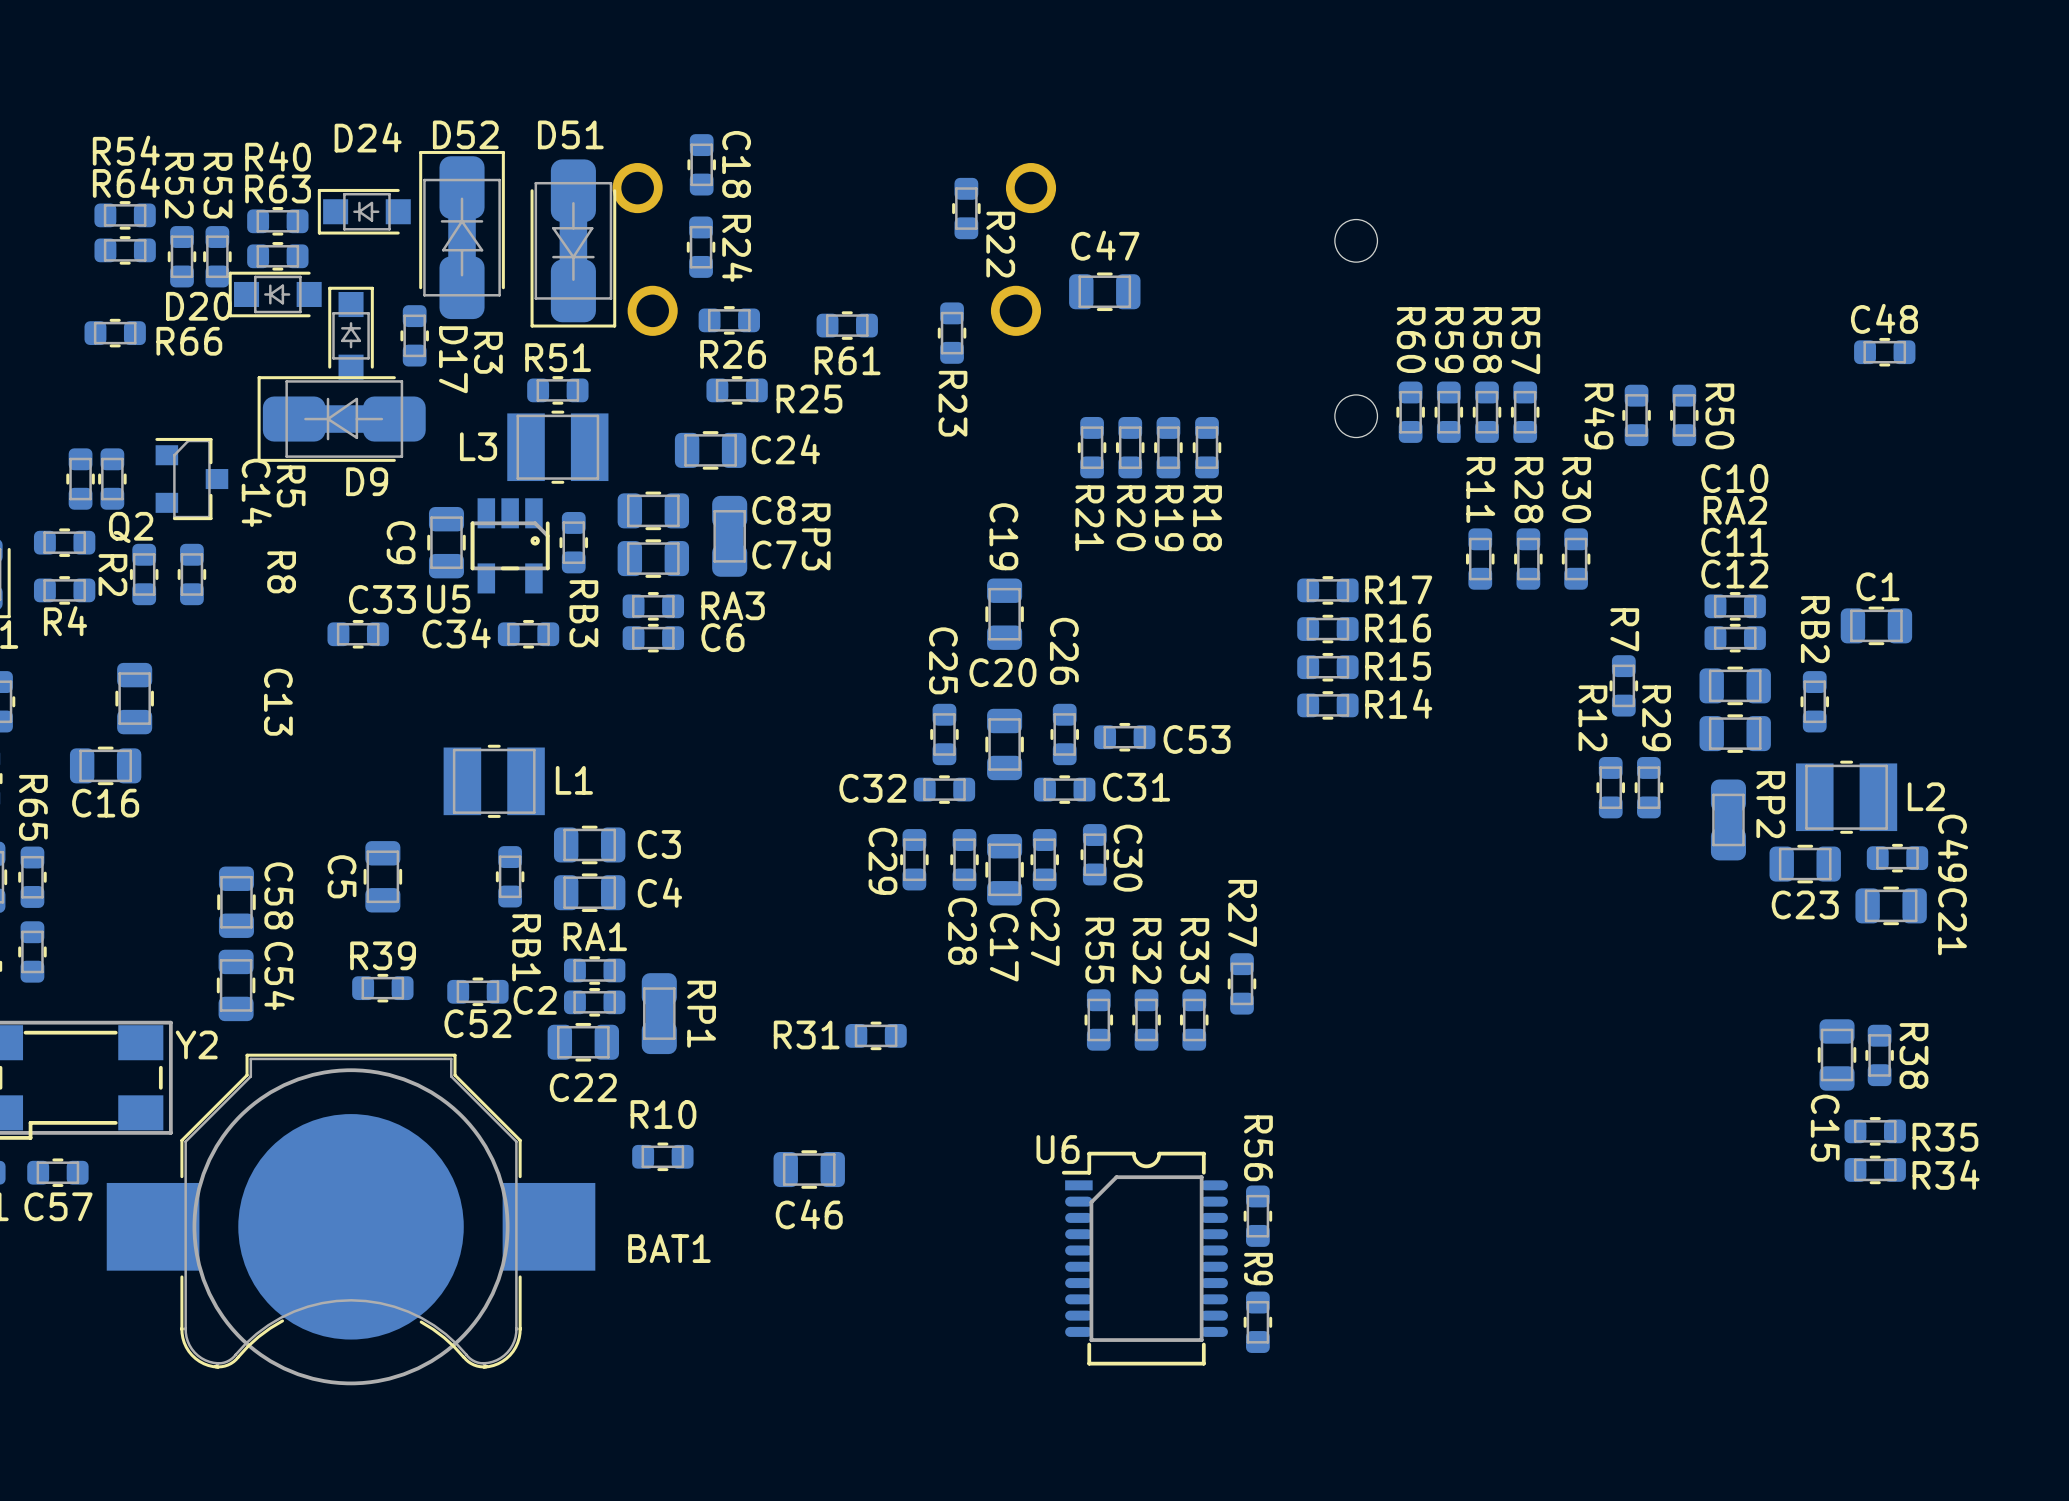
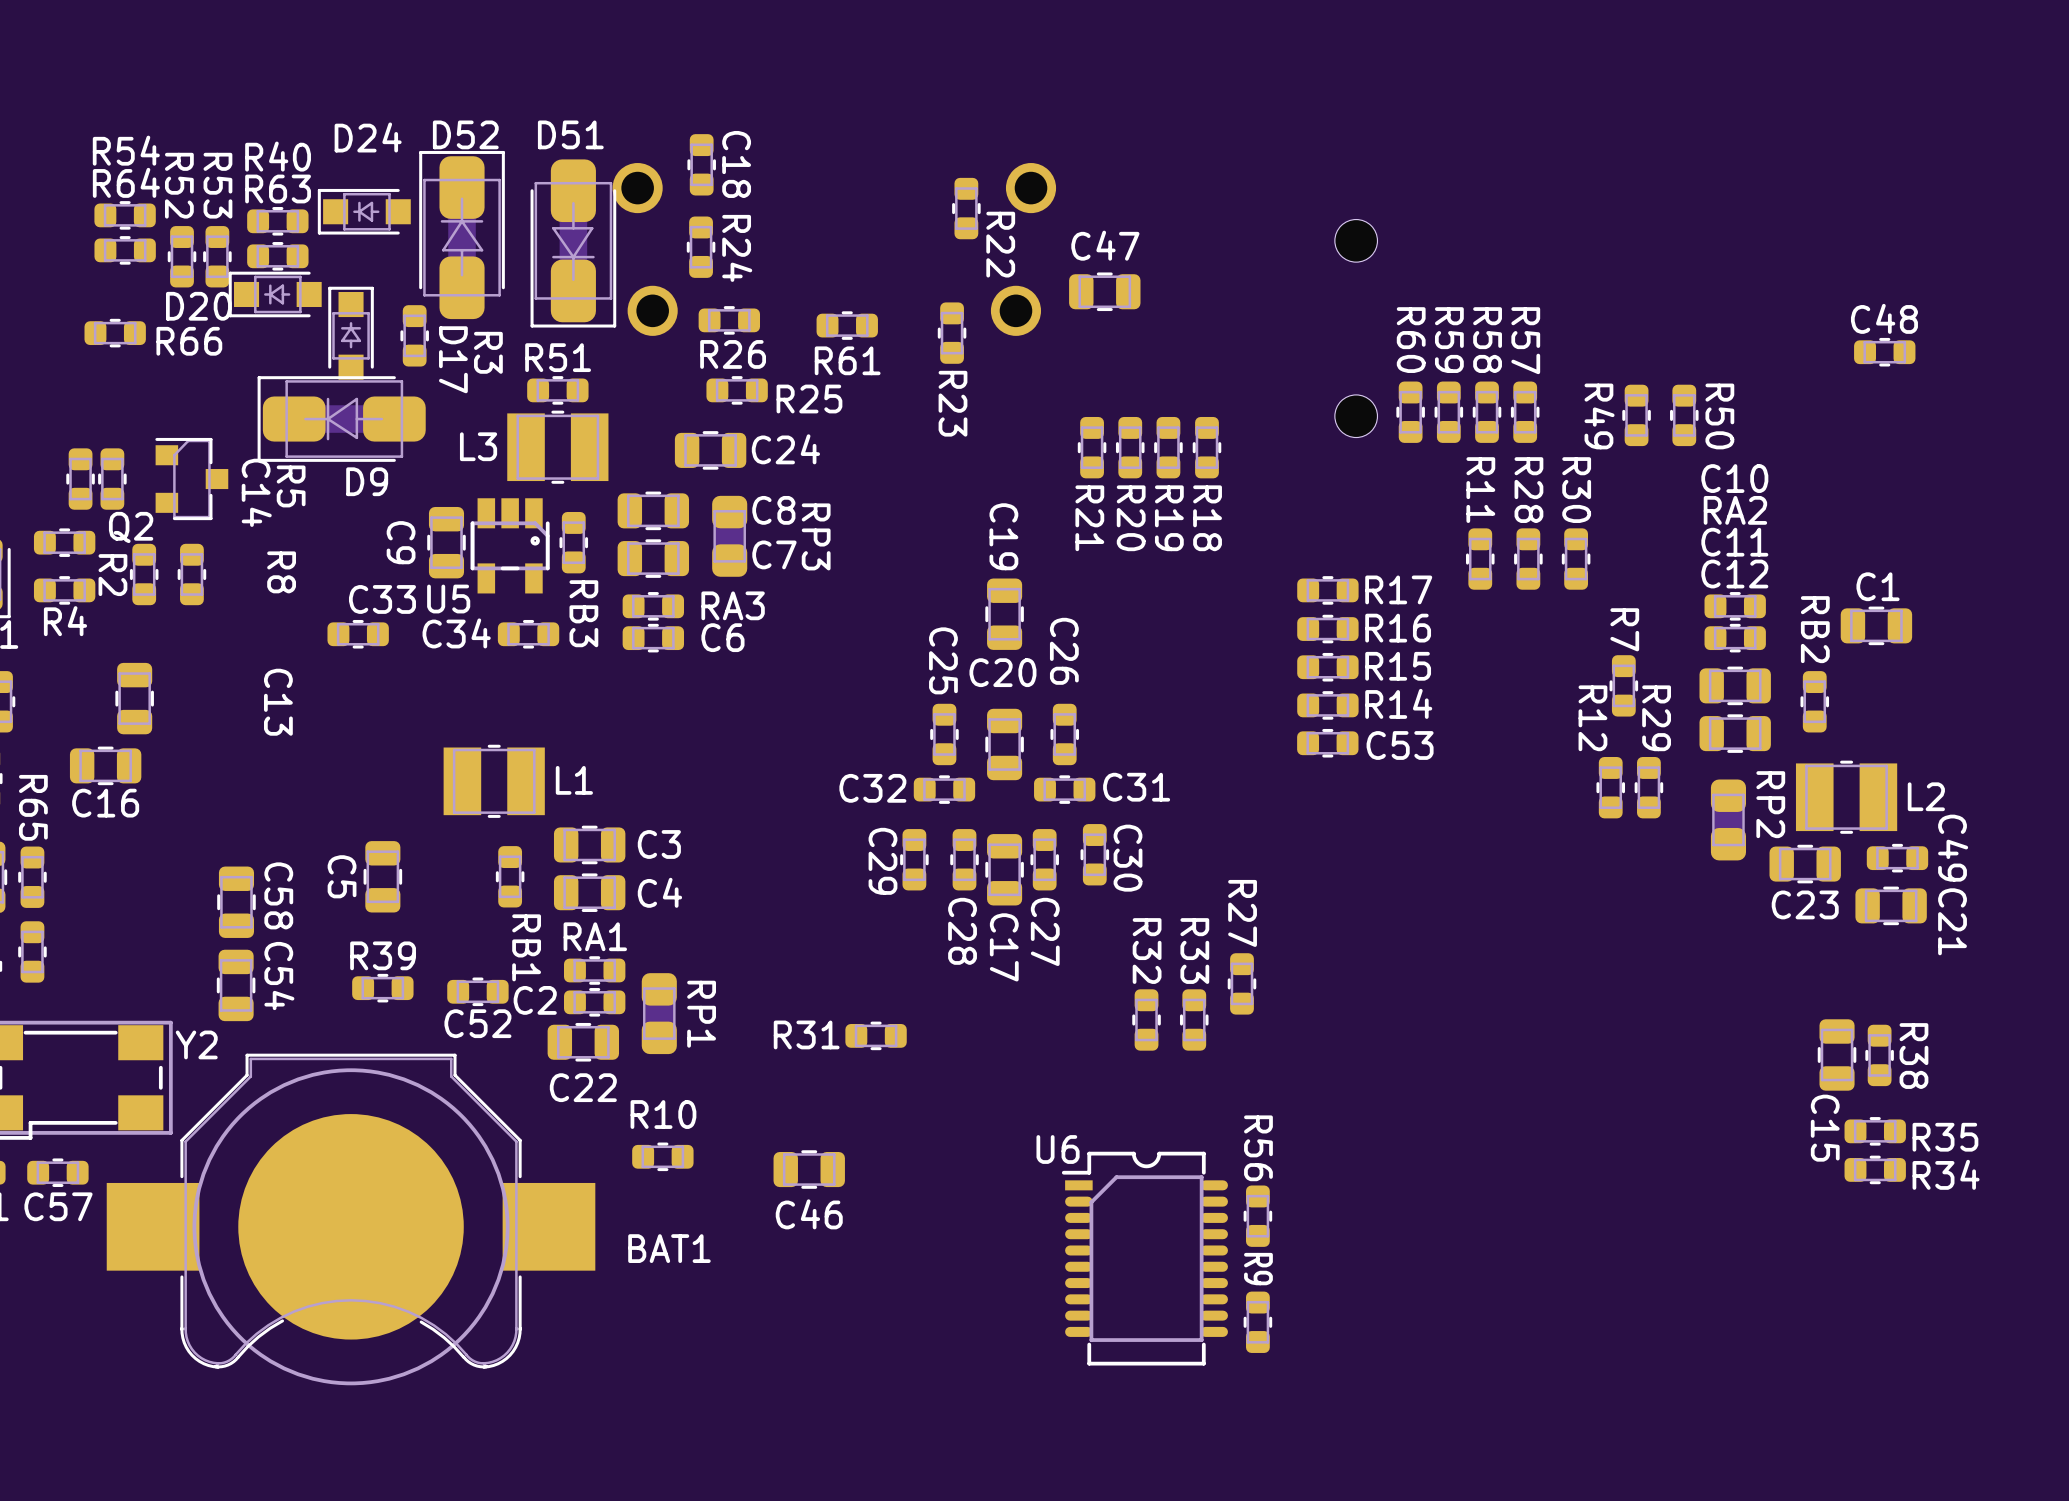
C53 position: (1124, 737) -> (1327, 743)
R55: (1098, 1019) -> none

